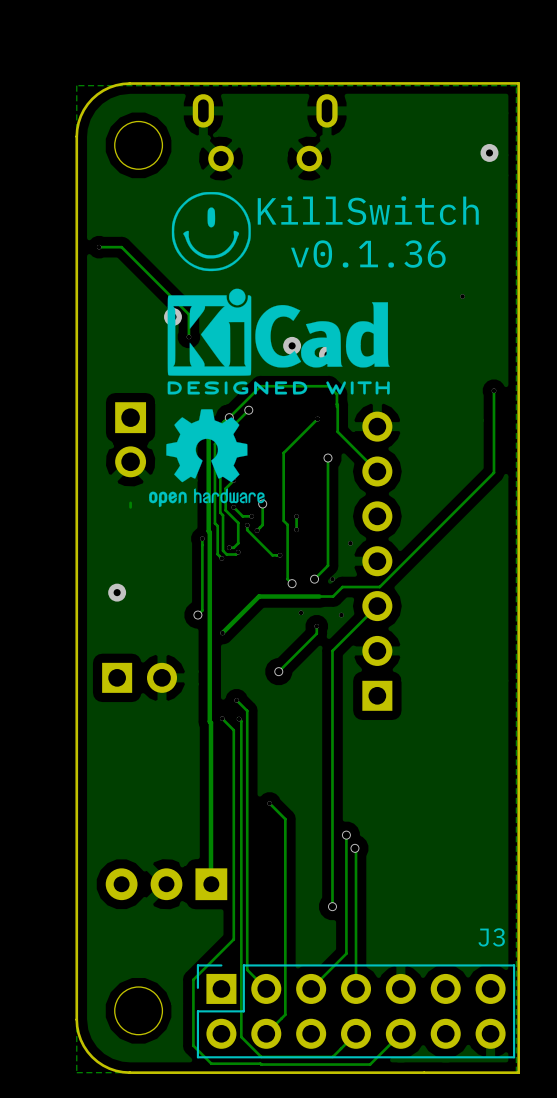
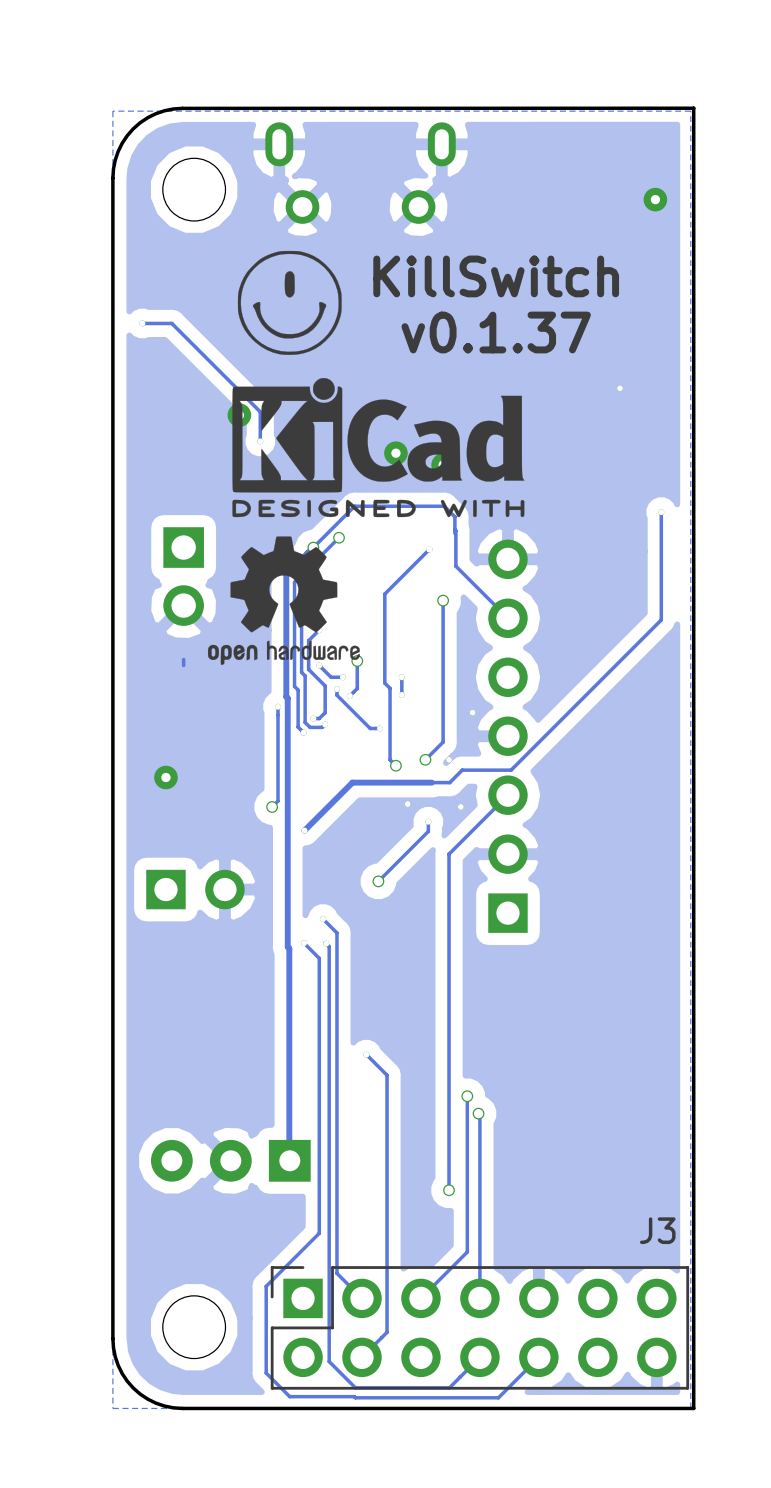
text: v0.1.36 (368, 254) -> v0.1.37 (496, 332)

